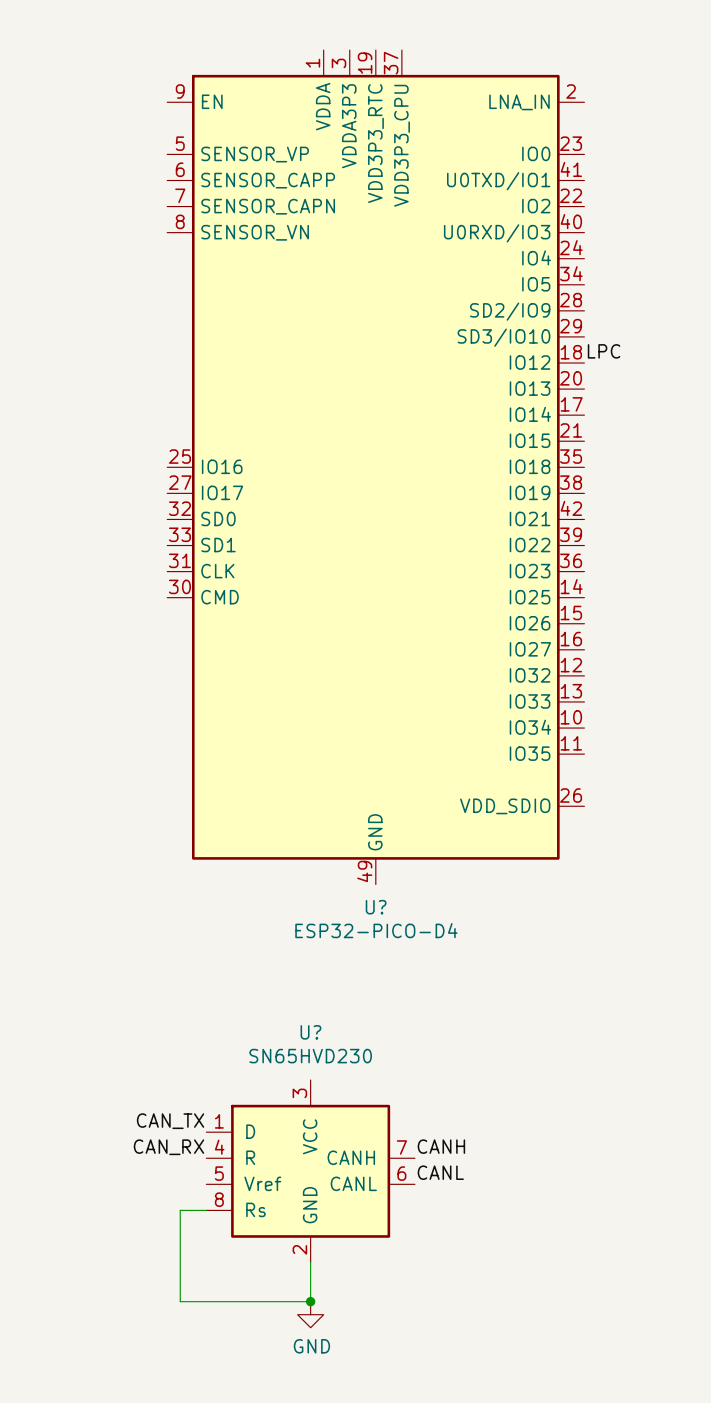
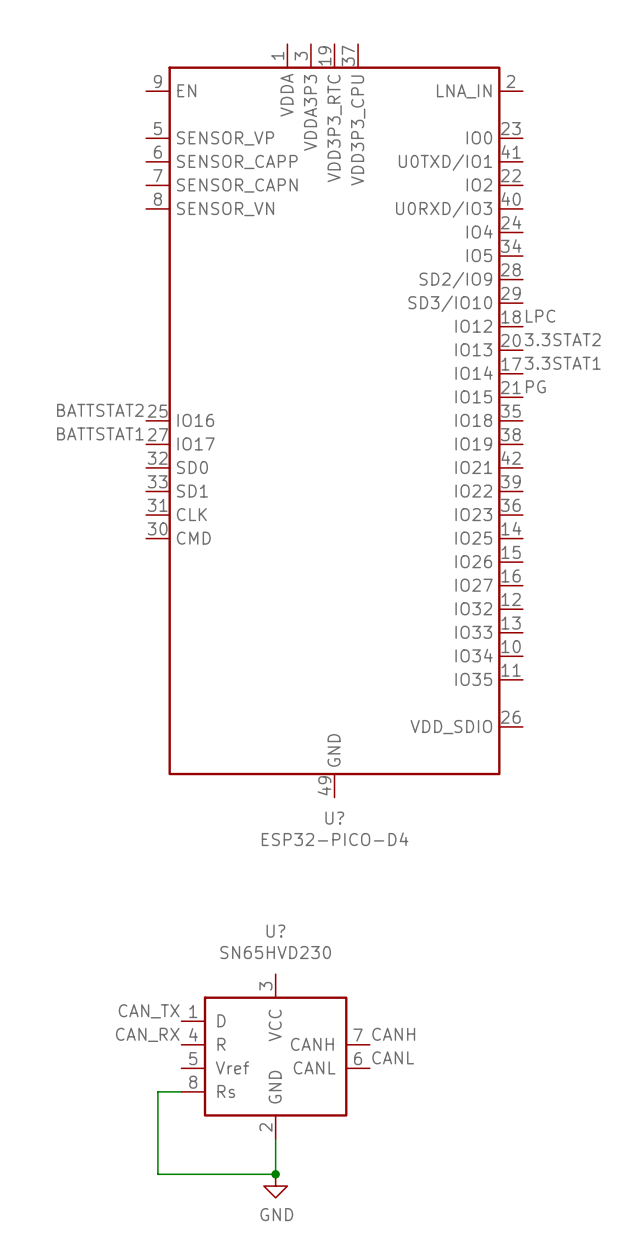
label: none -> 3.3STAT2 (562, 339)
label: none -> 3.3STAT1 (562, 363)
label: none -> PG (535, 386)
label: none -> BATTSTAT2 (100, 410)
label: none -> BATTSTAT1 (100, 433)

